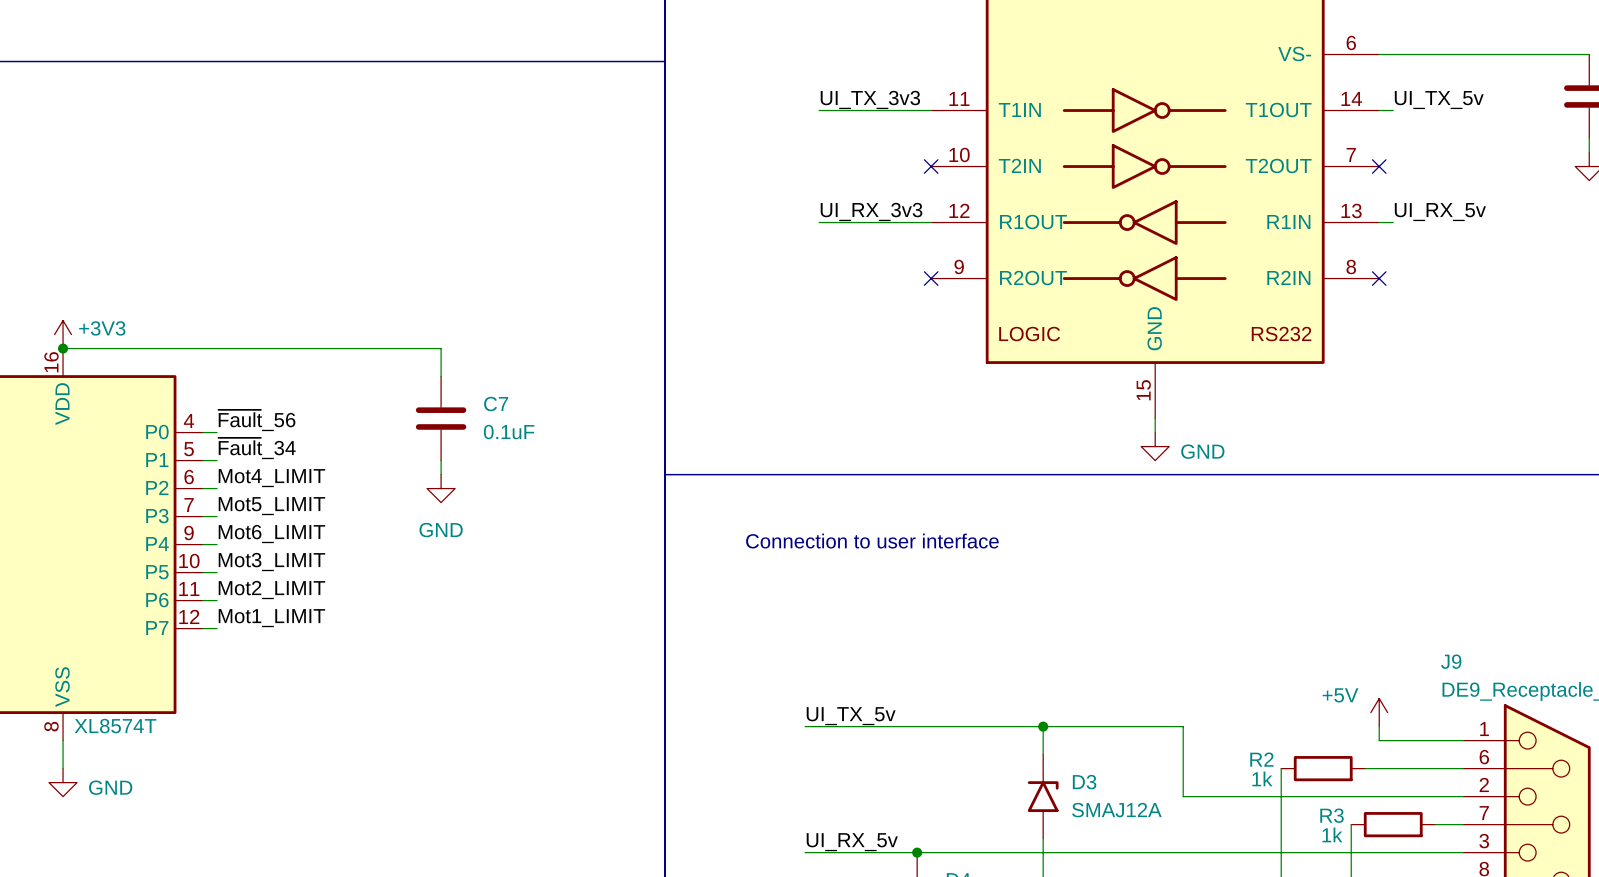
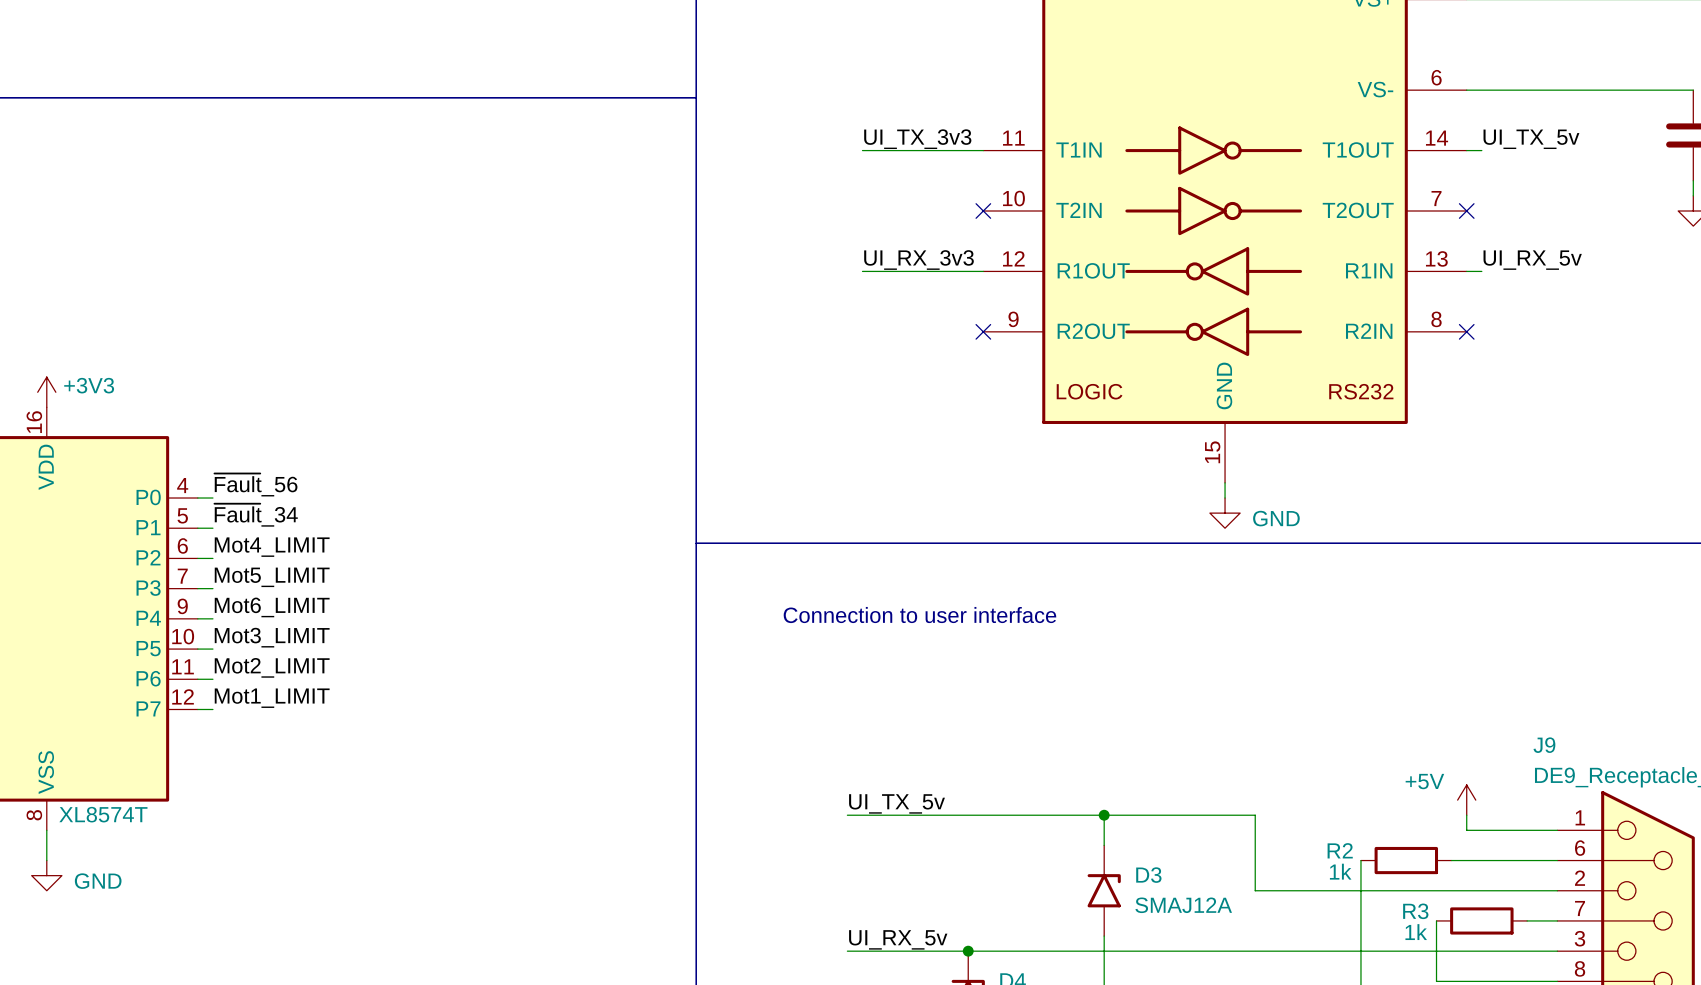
wire: (63, 348) (441, 348) (441, 376) -> none
junction: (63, 348) -> none
C7: 0.1uF (441, 418) -> none
wire: (441, 460) (441, 474) -> none
power symbol: GND (441, 488) -> none

